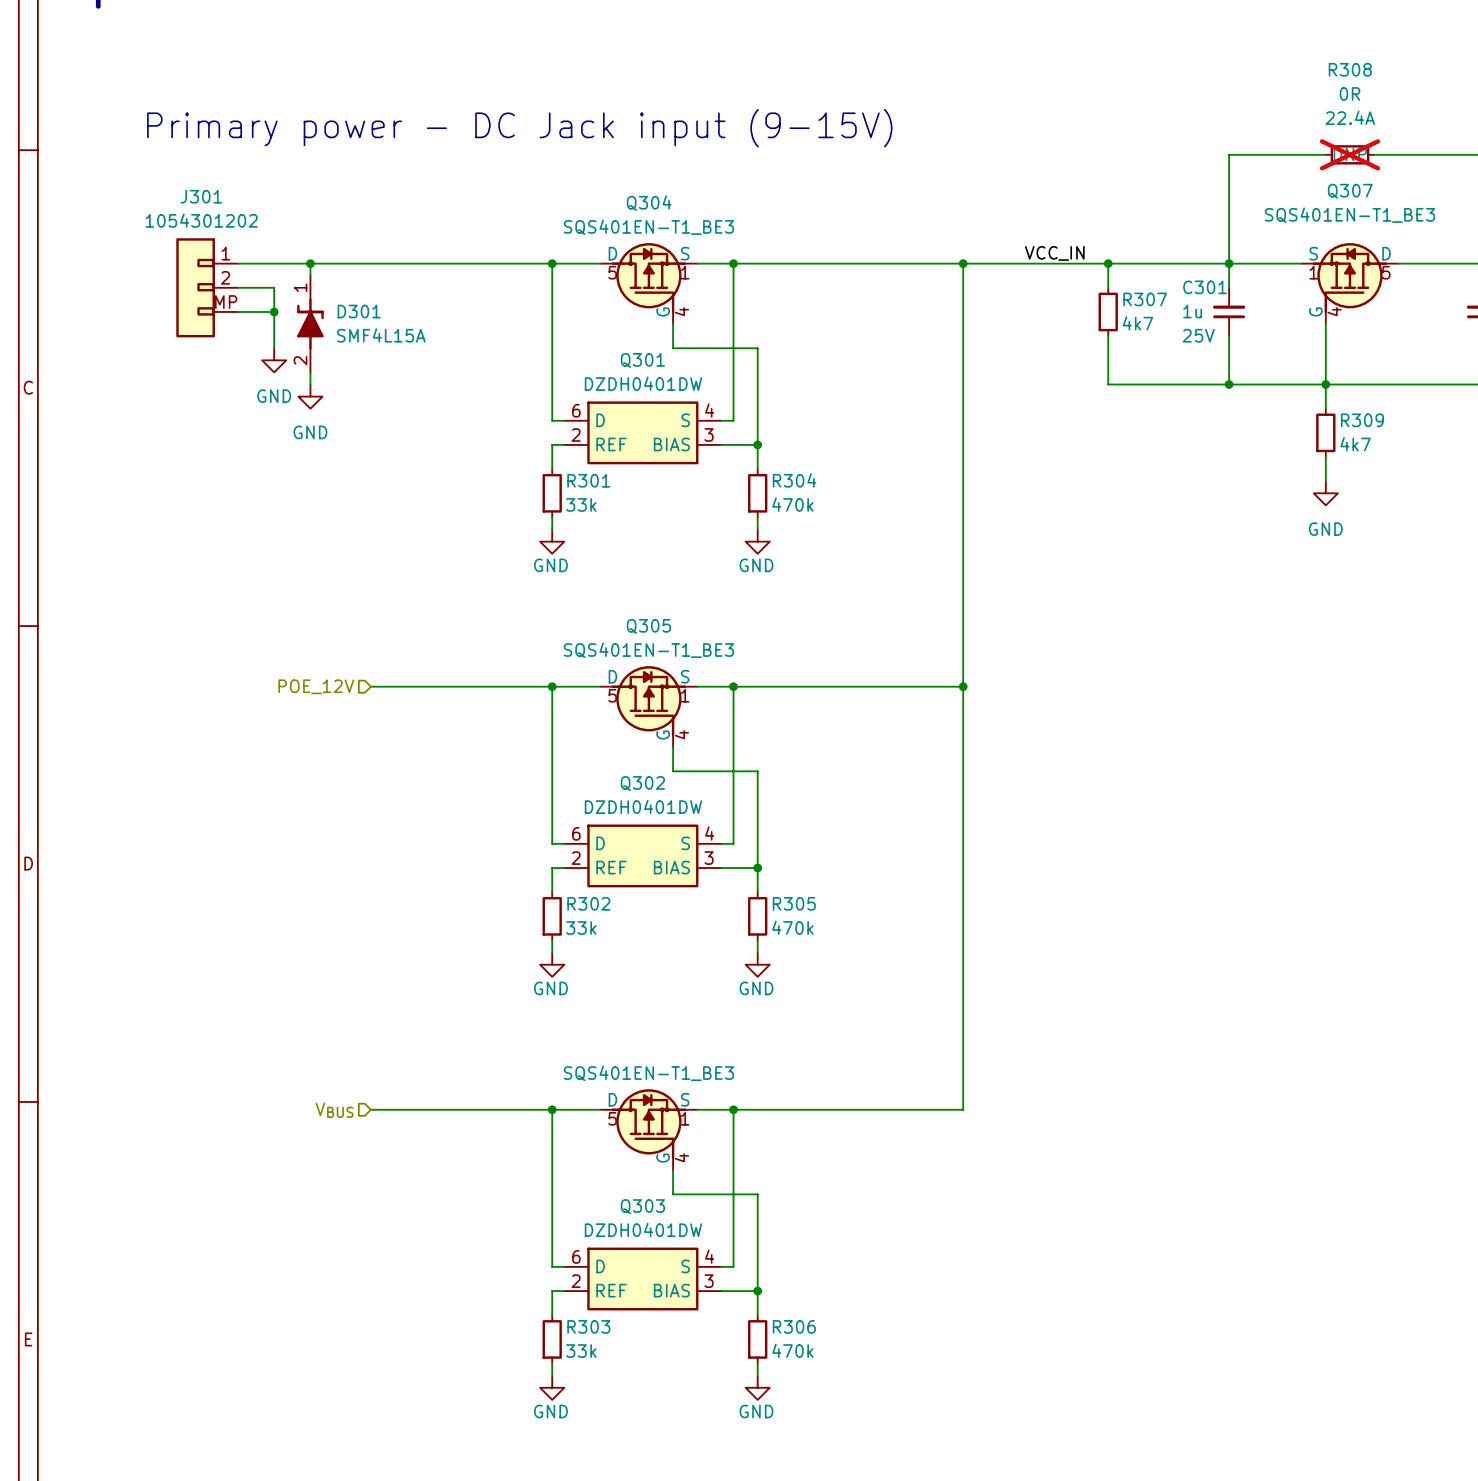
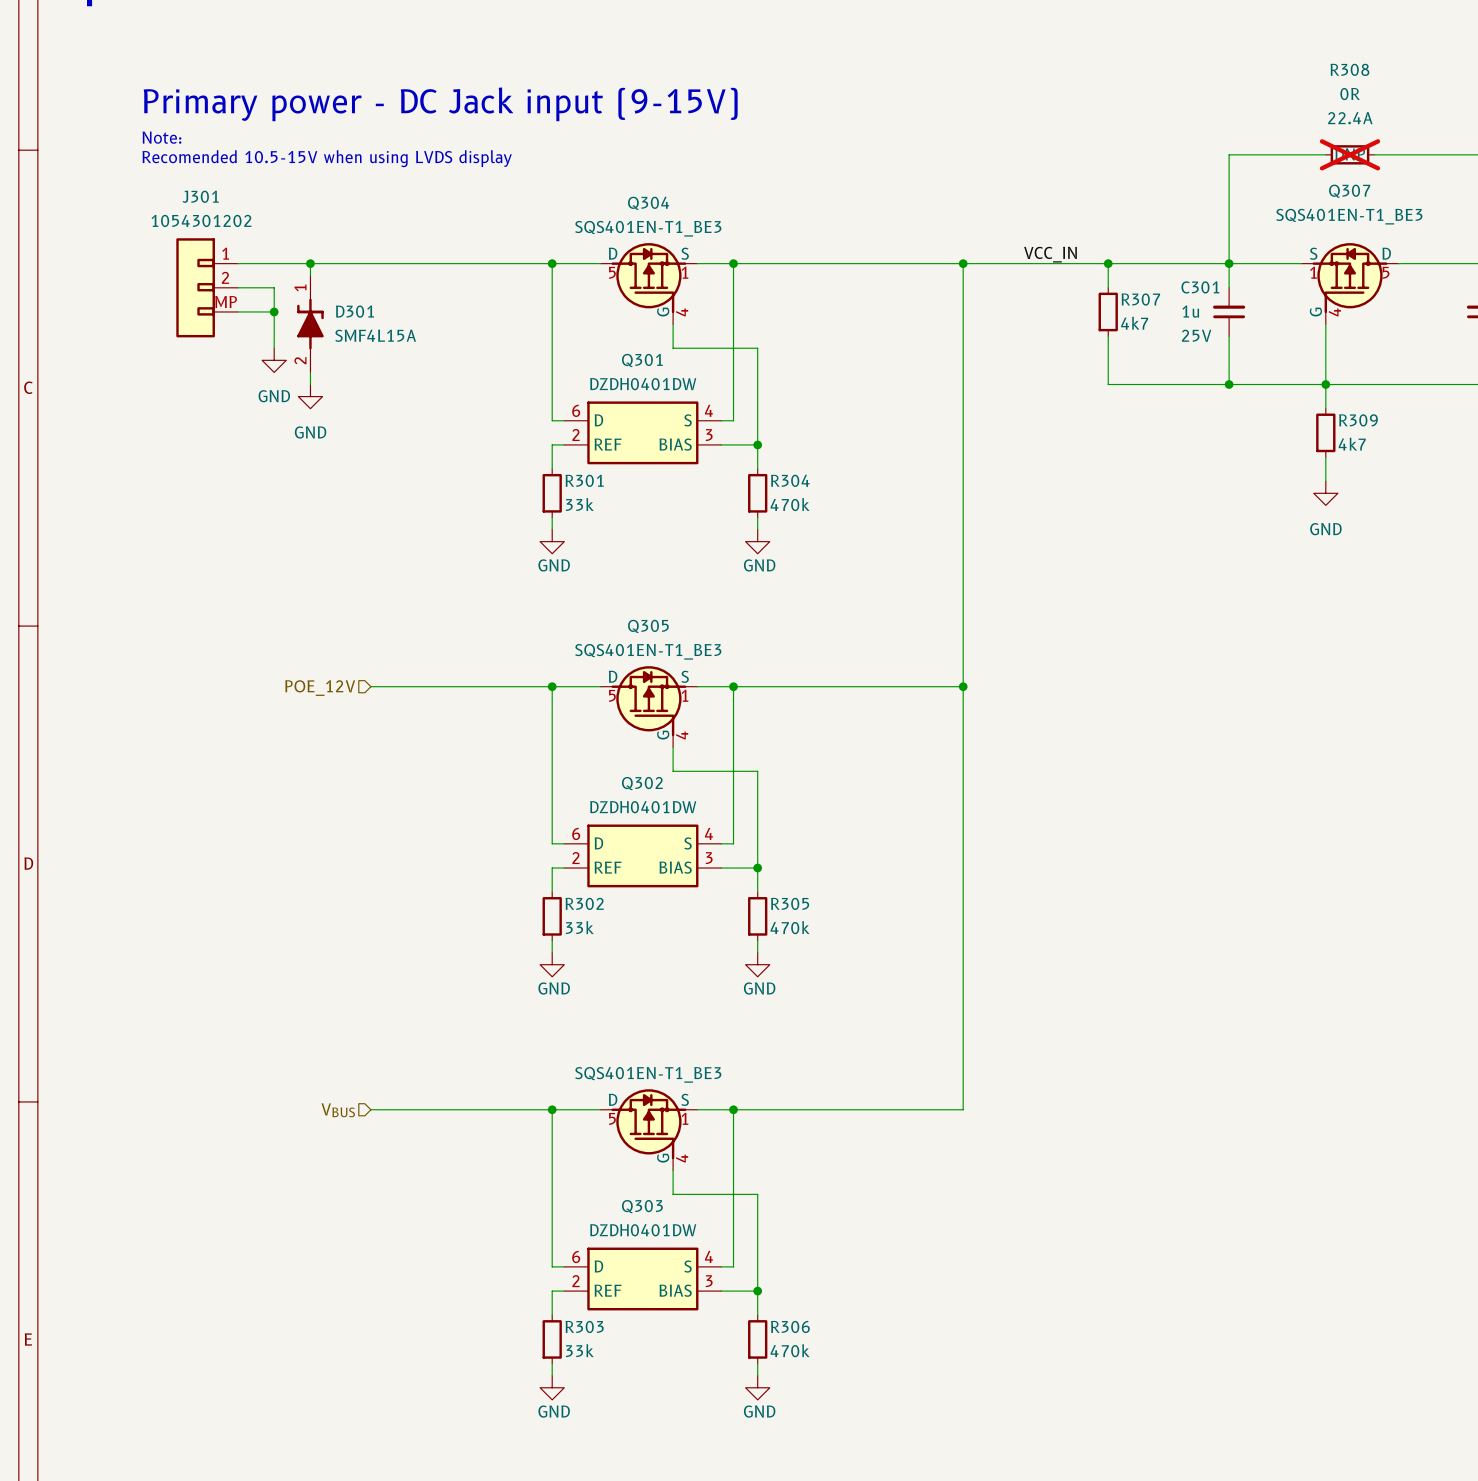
text: none -> Primary power - DC Jack input (9-15V) (440, 104)
text: Primary power - DC Jack input (9-15V) (519, 128) -> Note: (161, 137)
text: none -> Recomended 10.5-15V when using LVDS display (327, 158)

